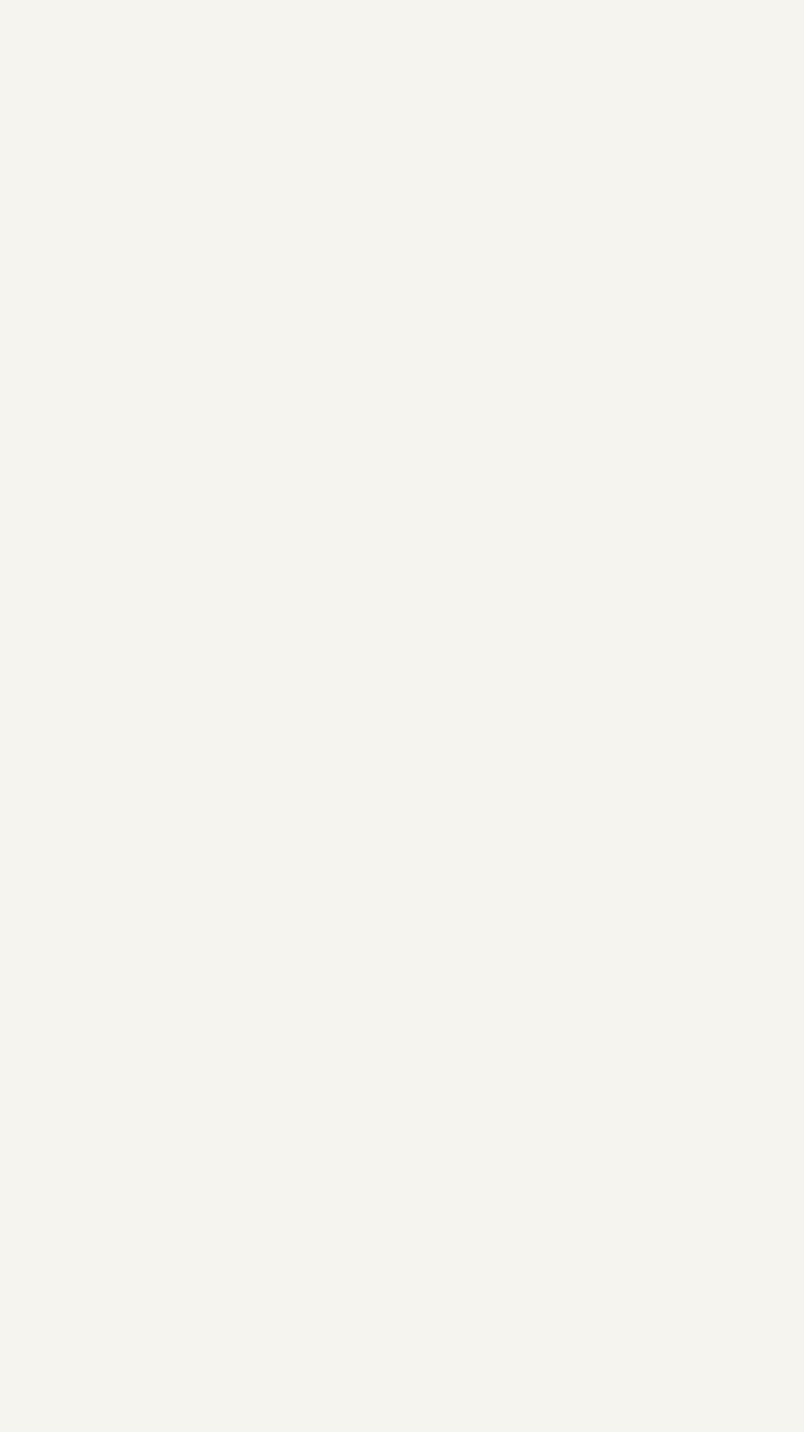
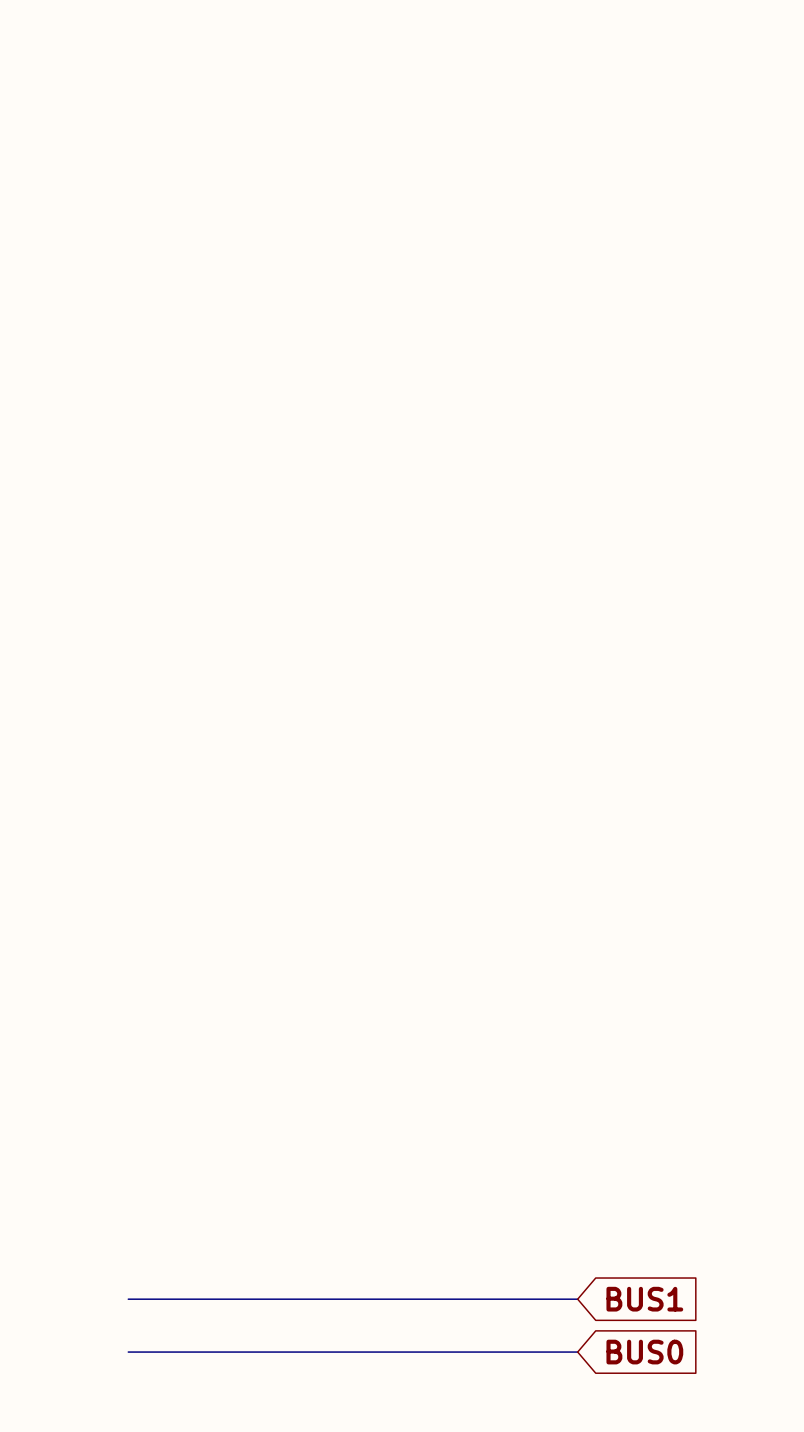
wire: none -> (128, 1299) (577, 1299)
global label: none -> BUS1 (644, 1299)
wire: none -> (128, 1352) (577, 1352)
global label: none -> BUS0 (644, 1352)

